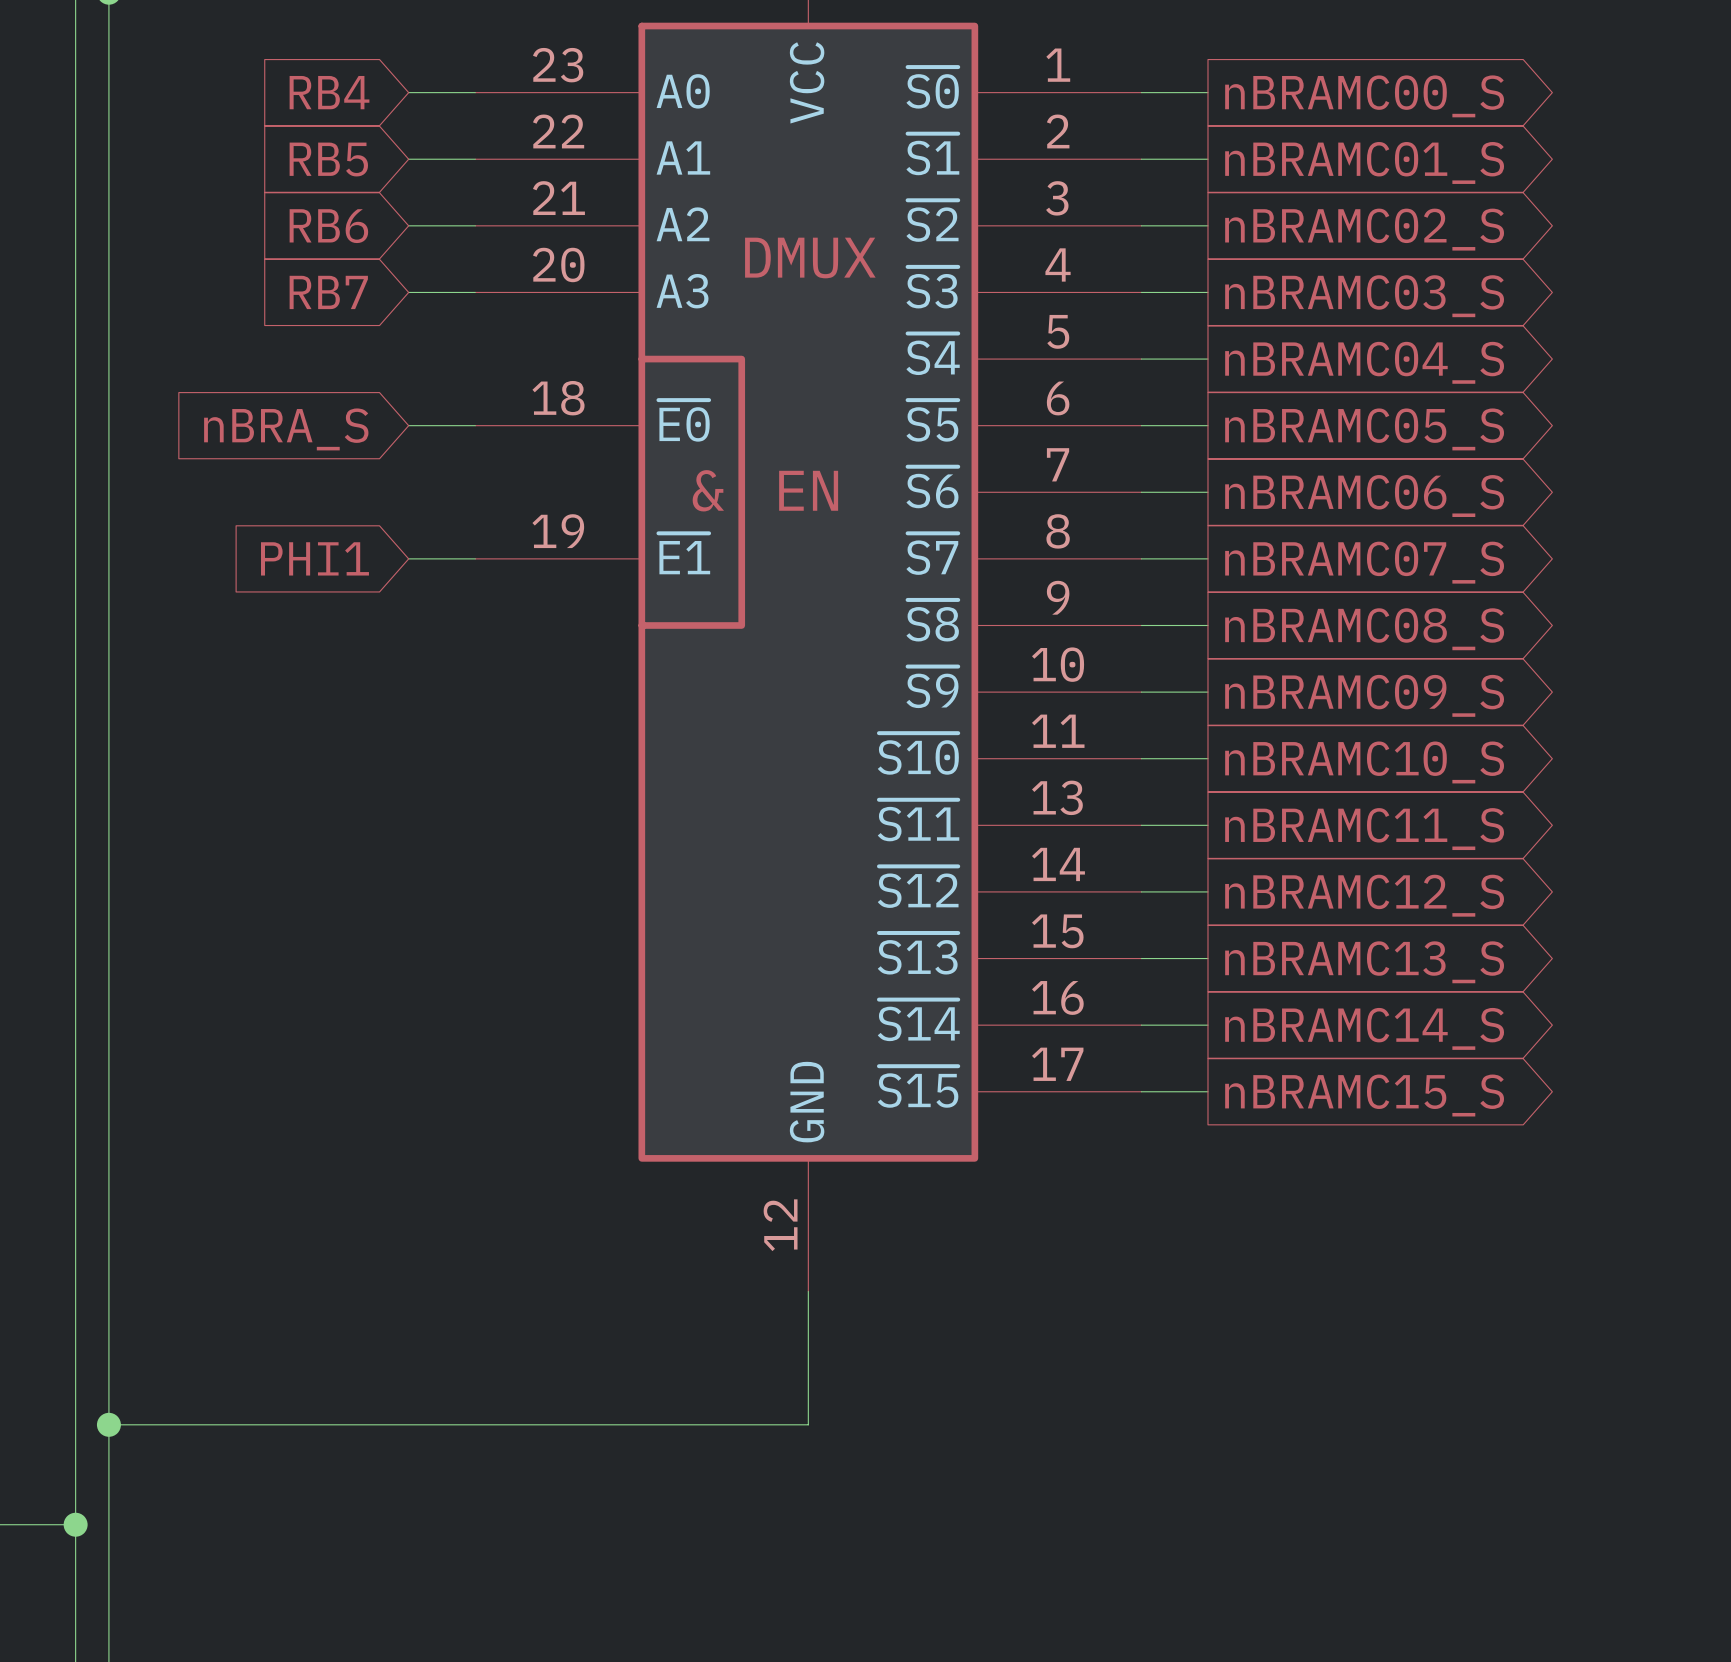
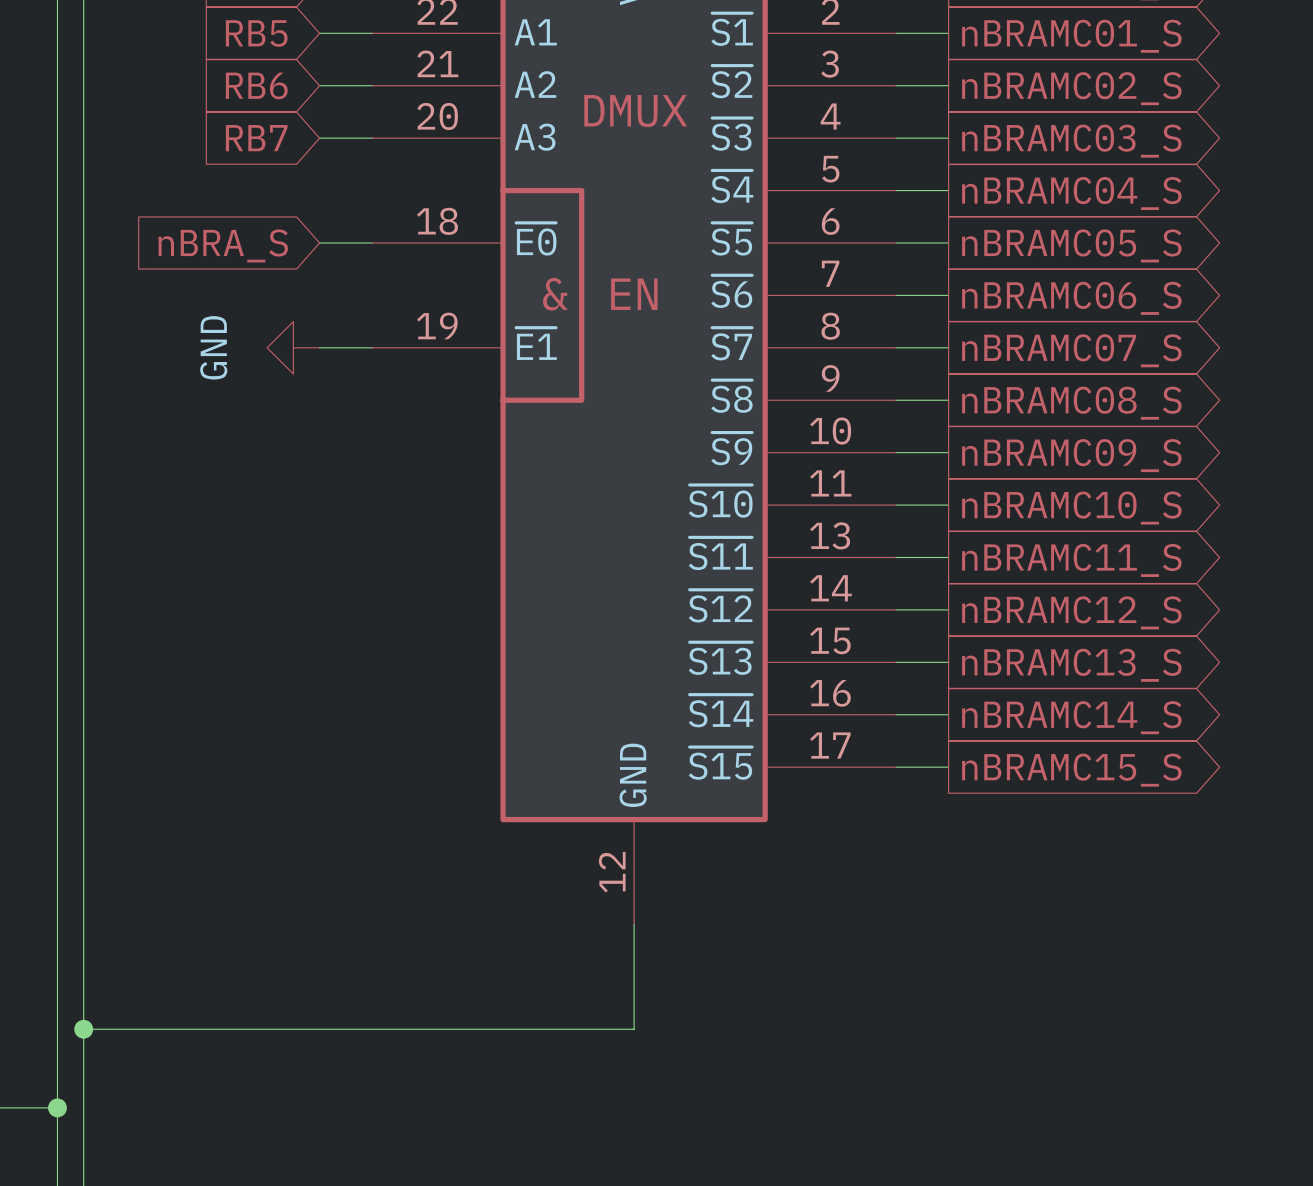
global label: PHI1 (314, 558) -> none
power symbol: none -> GND (293, 347)

